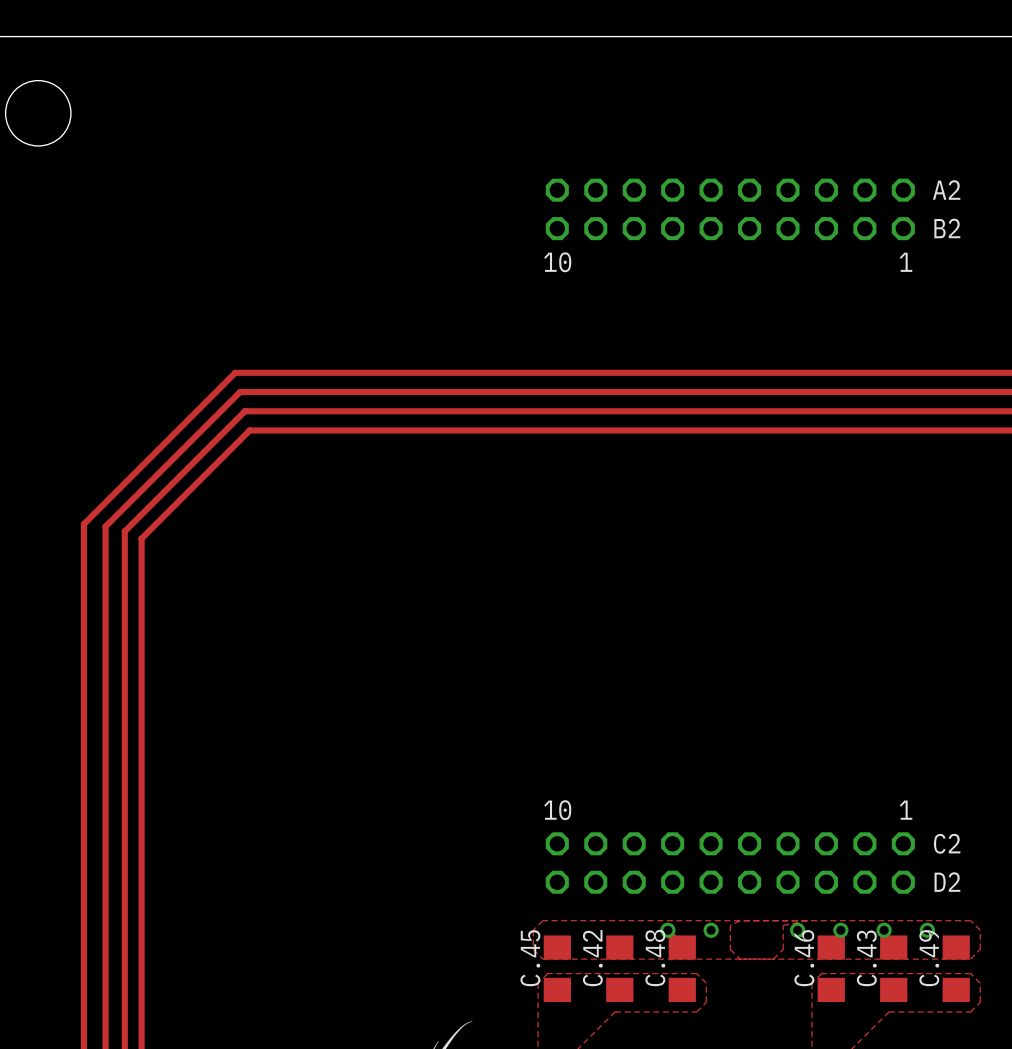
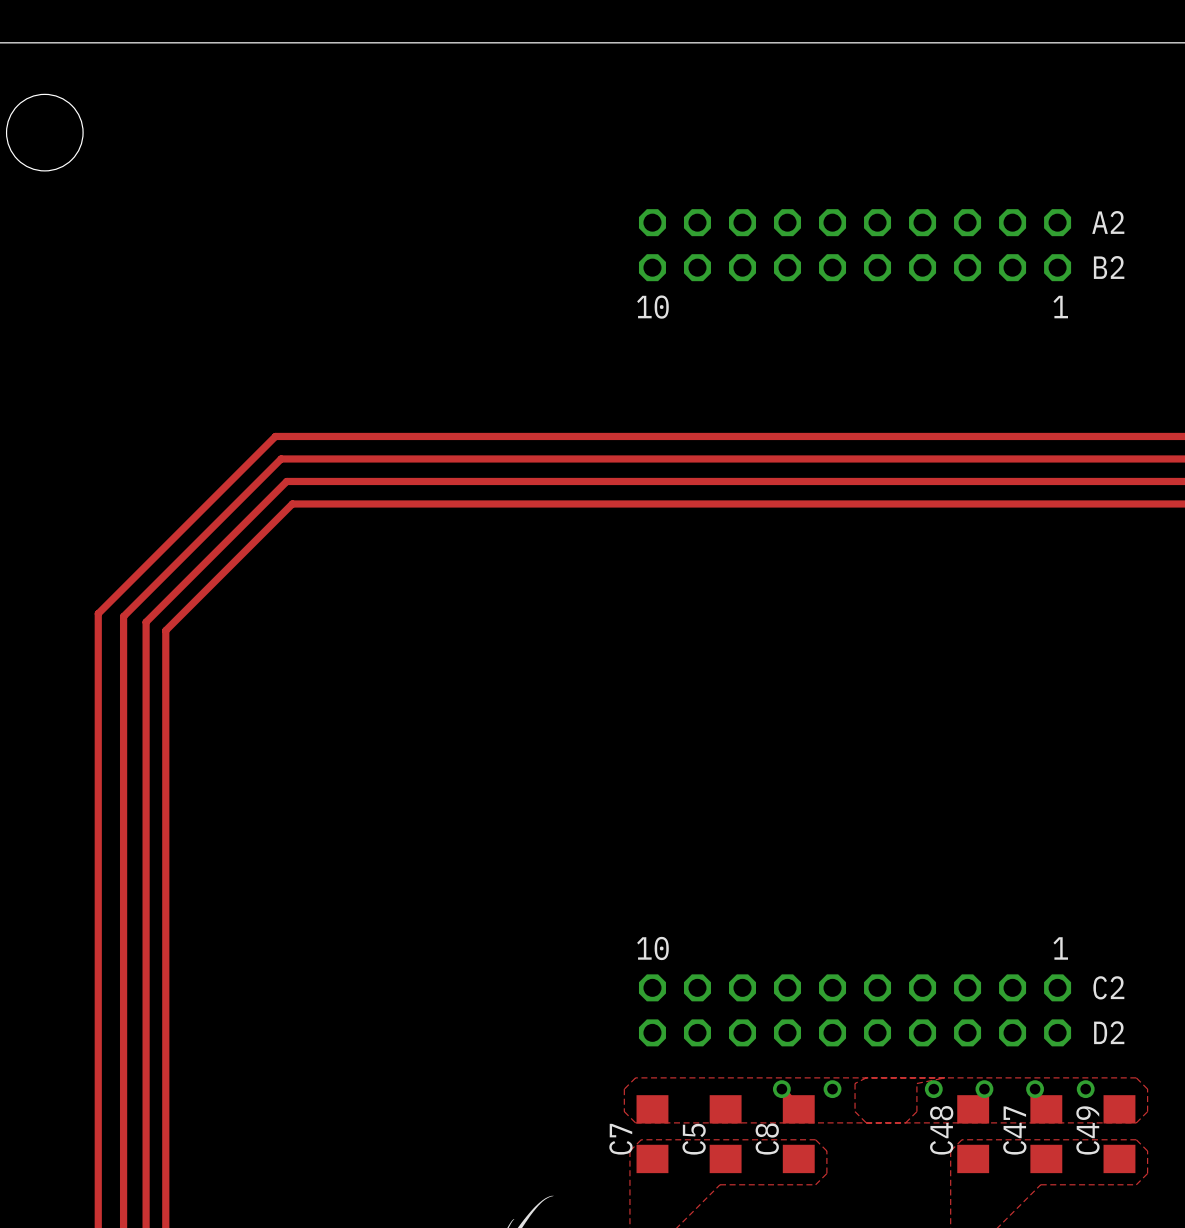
C.45 name: C.45 (530, 958) -> C7 (620, 1139)
C.42 name: C.42 (592, 958) -> C5 (694, 1139)
C.48 name: C.48 (655, 958) -> C8 (767, 1139)
C.46 name: C.46 (804, 958) -> C48 (941, 1130)
C.43 name: C.43 (866, 958) -> C47 (1014, 1130)
C.49 name: C.49 (929, 958) -> C49 (1087, 1130)

